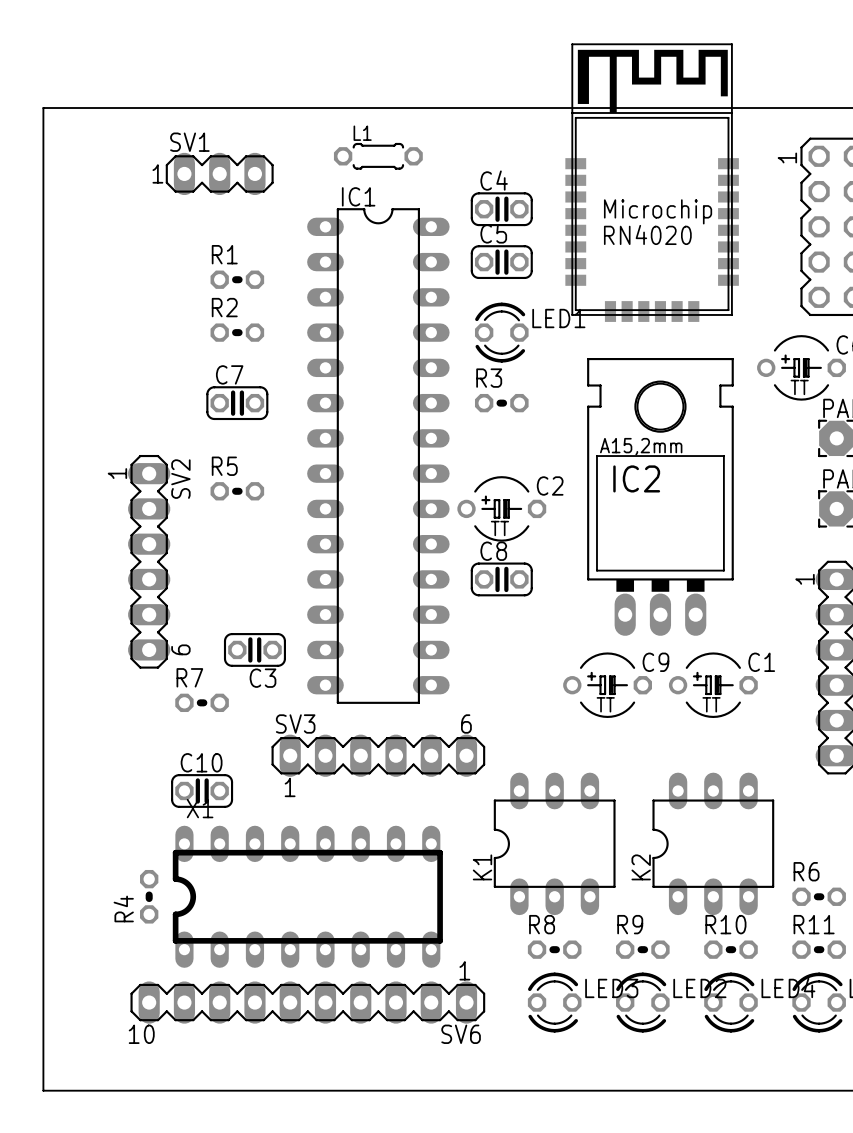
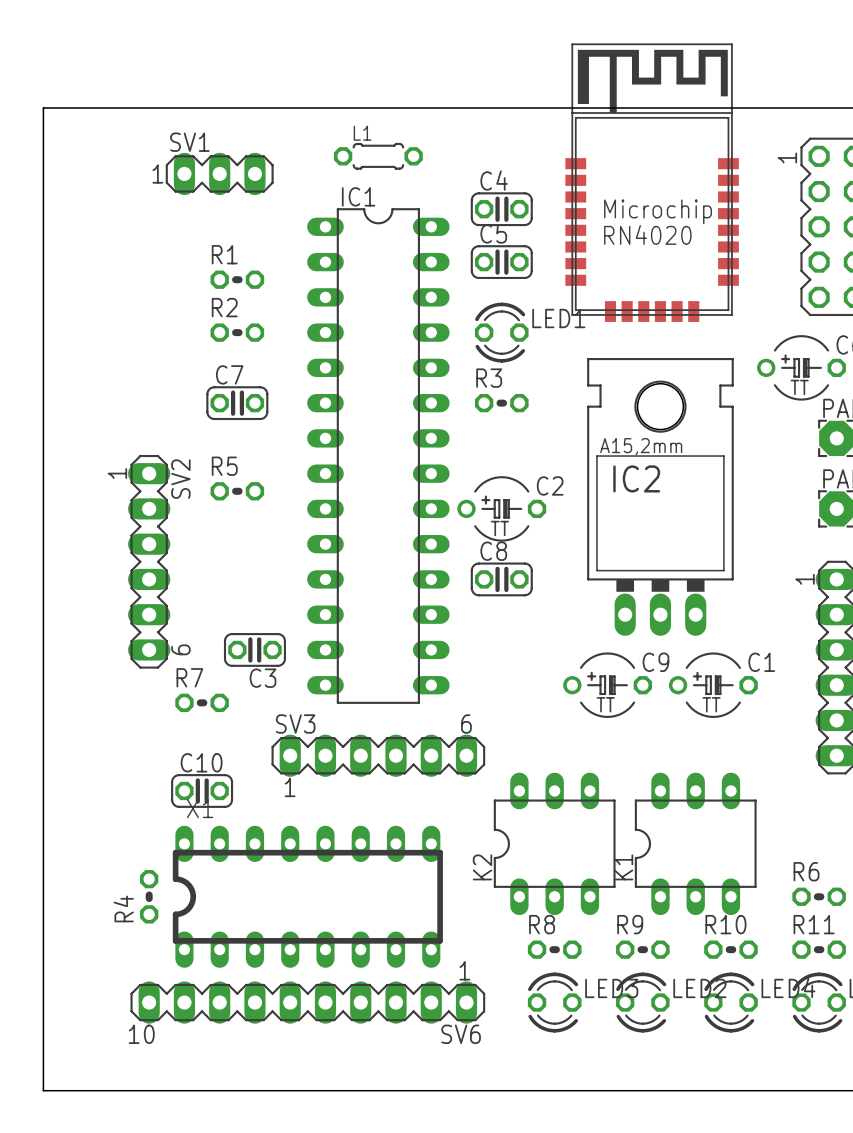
K1: none -> (695, 843)
K2: (713, 843) -> none
K1 name: K1 (482, 867) -> K2 (482, 867)

